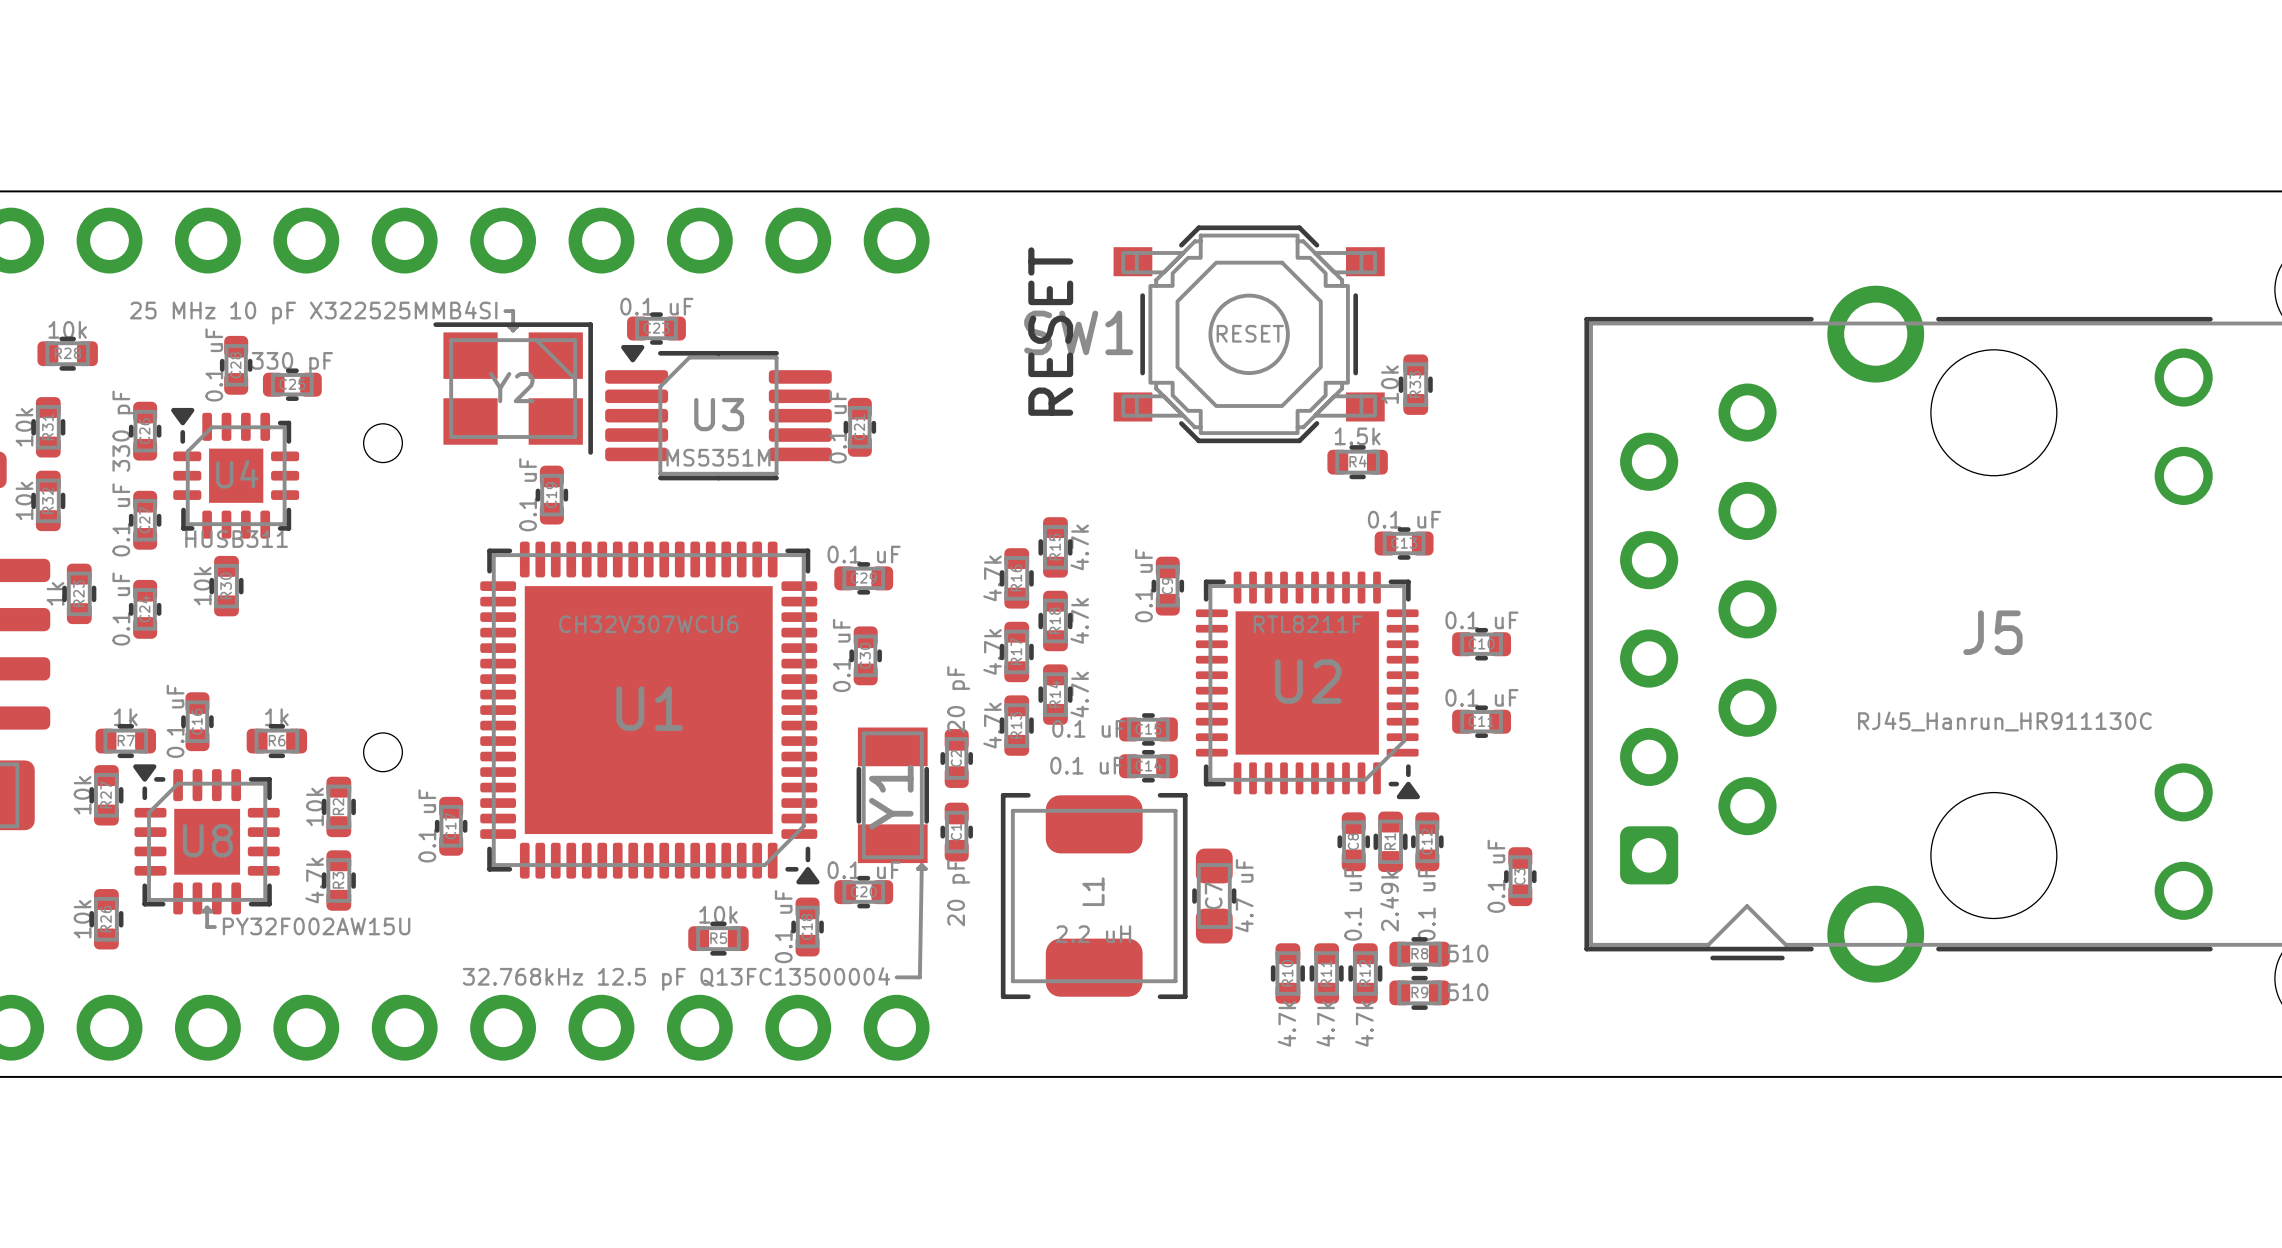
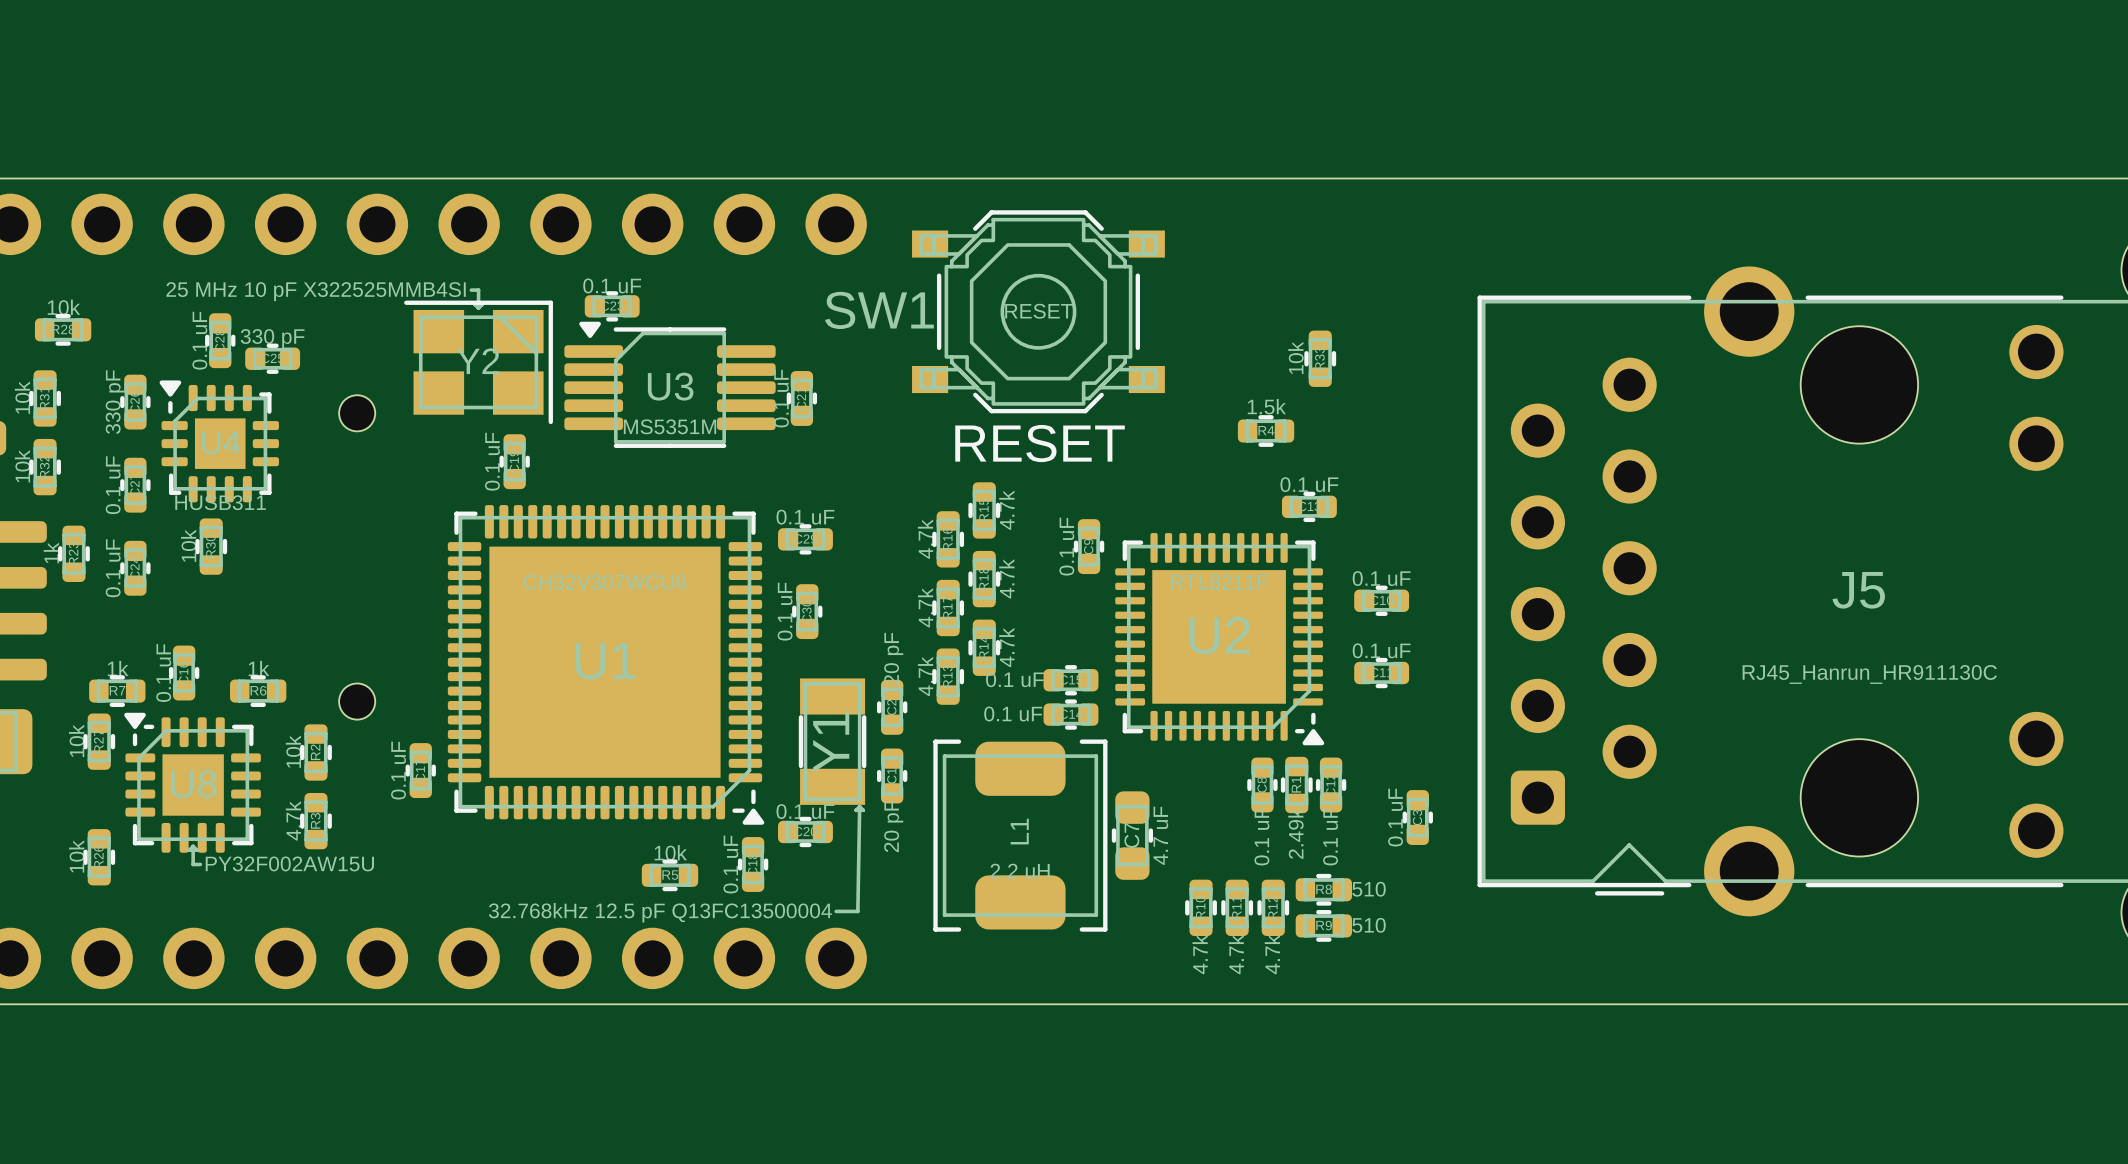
text rotation: 0° (1050, 331) -> 90° clockwise (1040, 443)
SW1 position: (1249, 334) -> (1038, 311)

